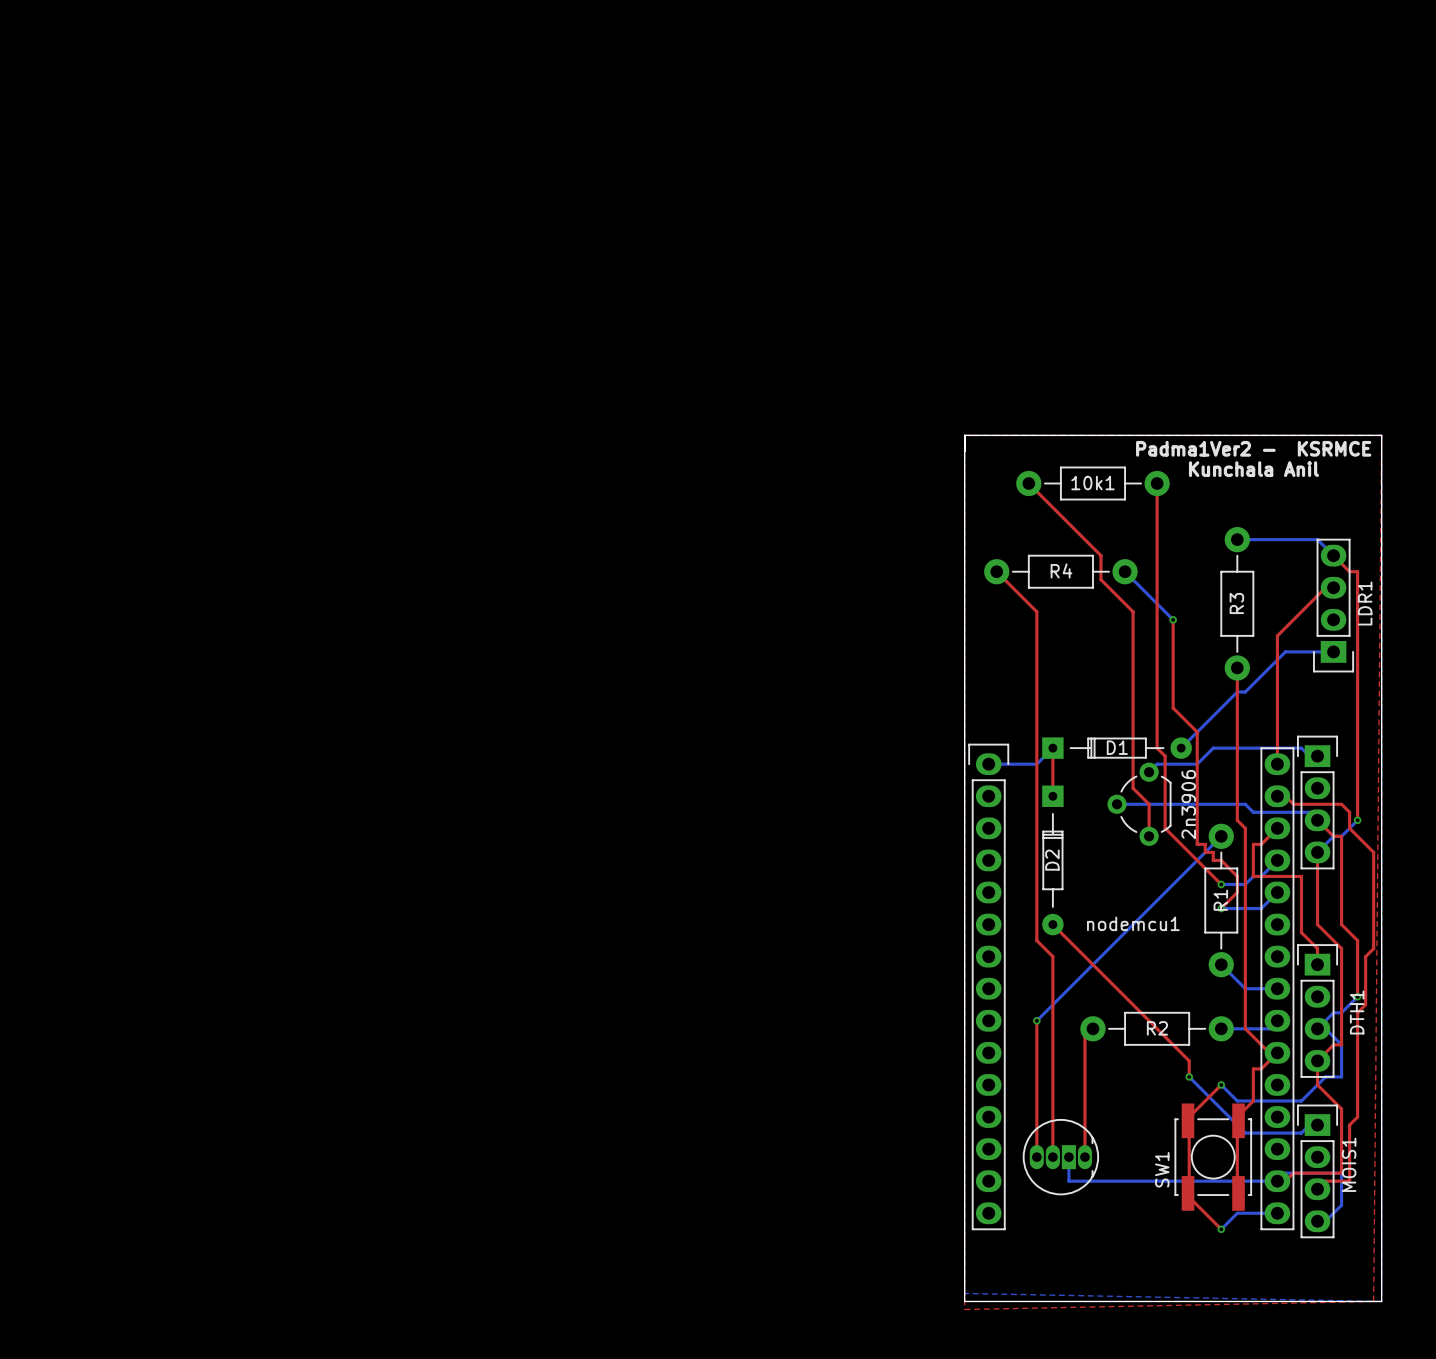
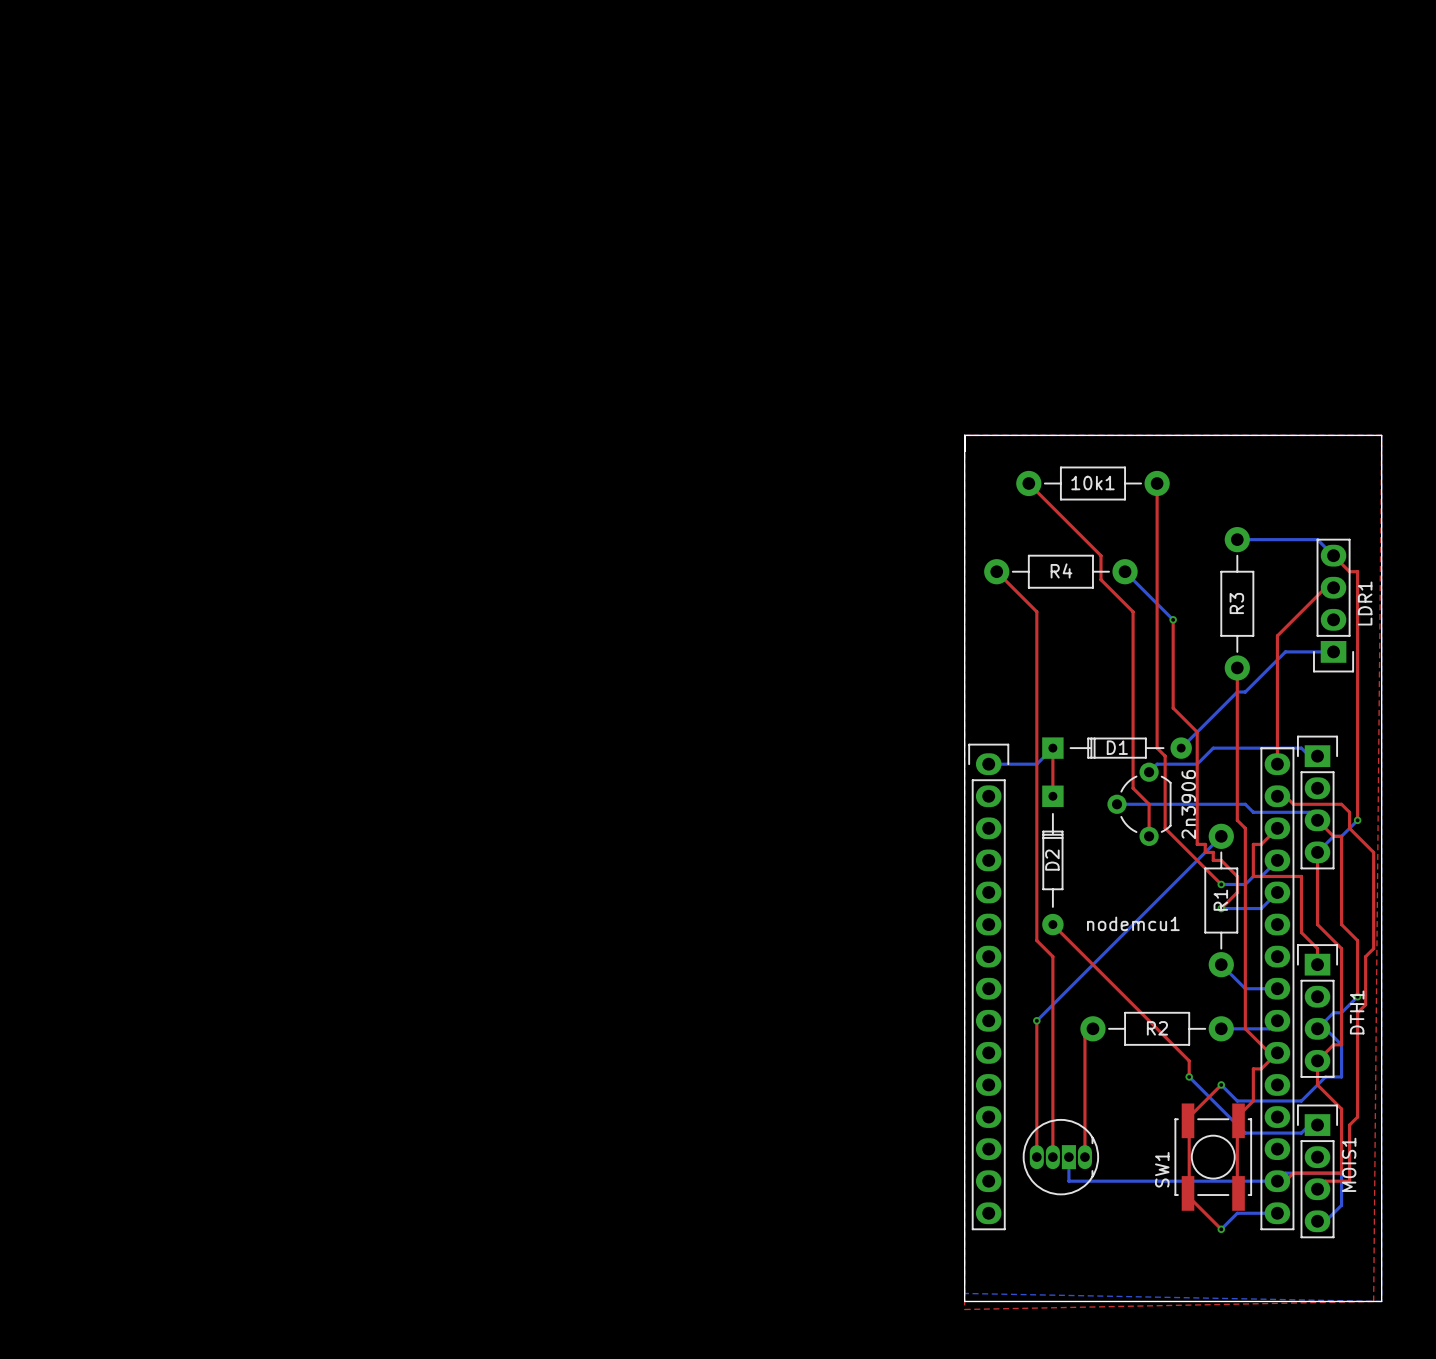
text: Padma1Ver2 - KSRMCE (1253, 448) -> none
text: Kunchala Anil (1253, 469) -> none

